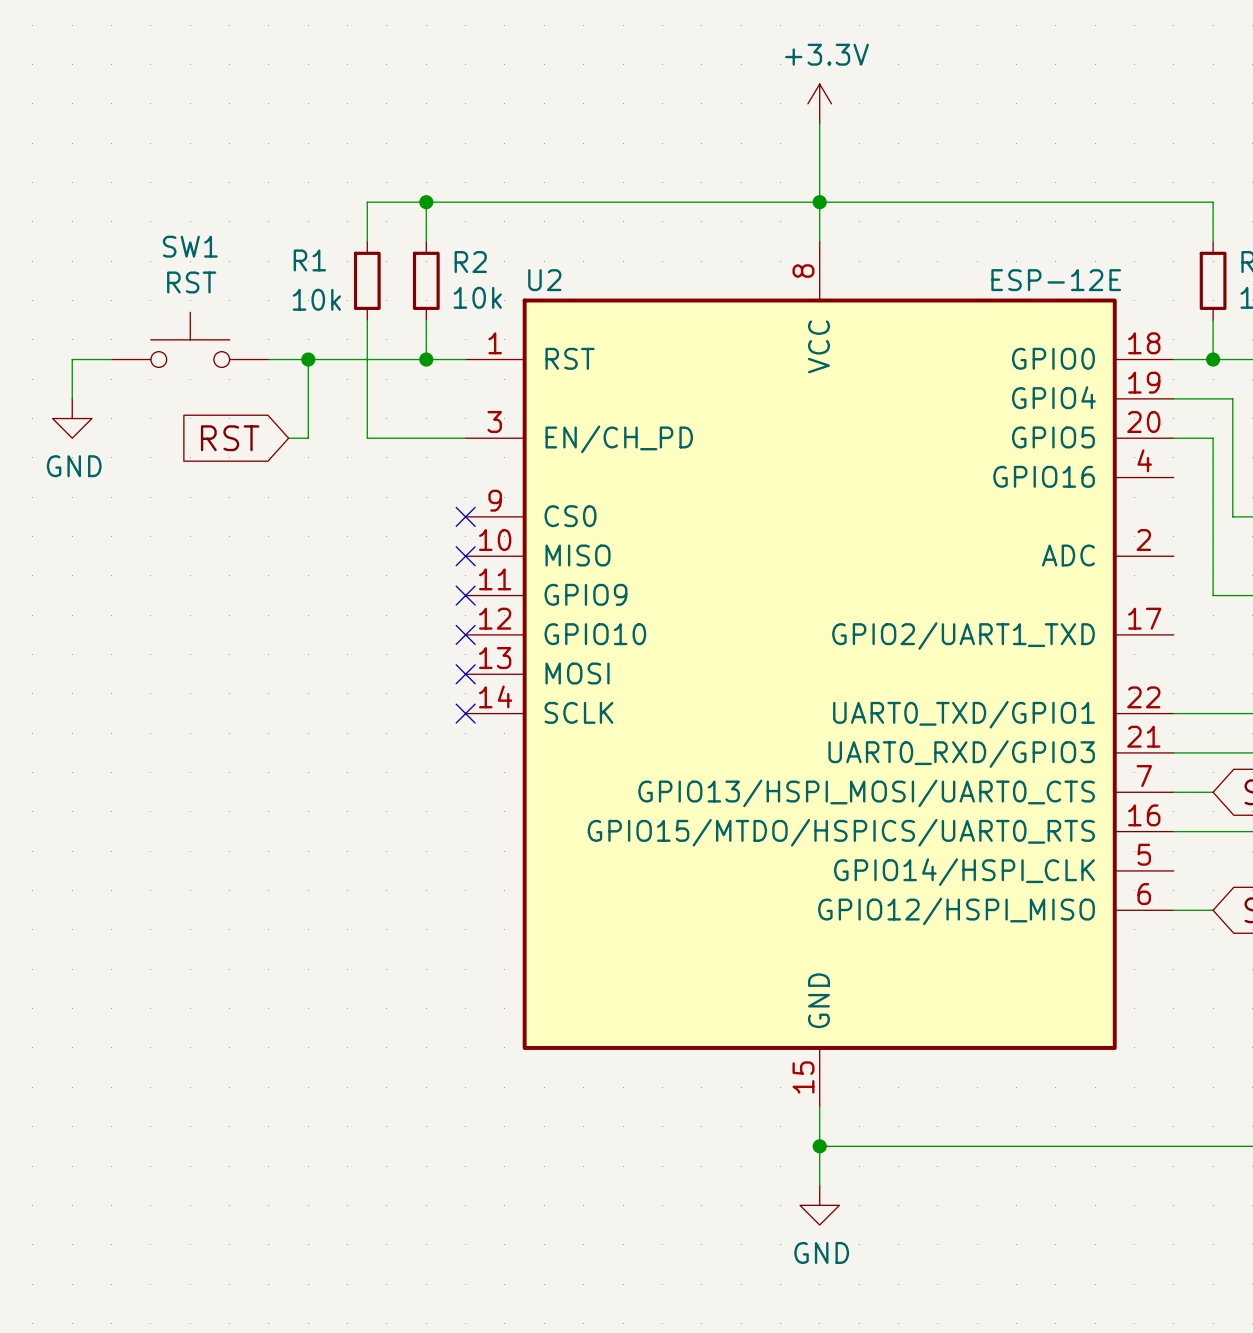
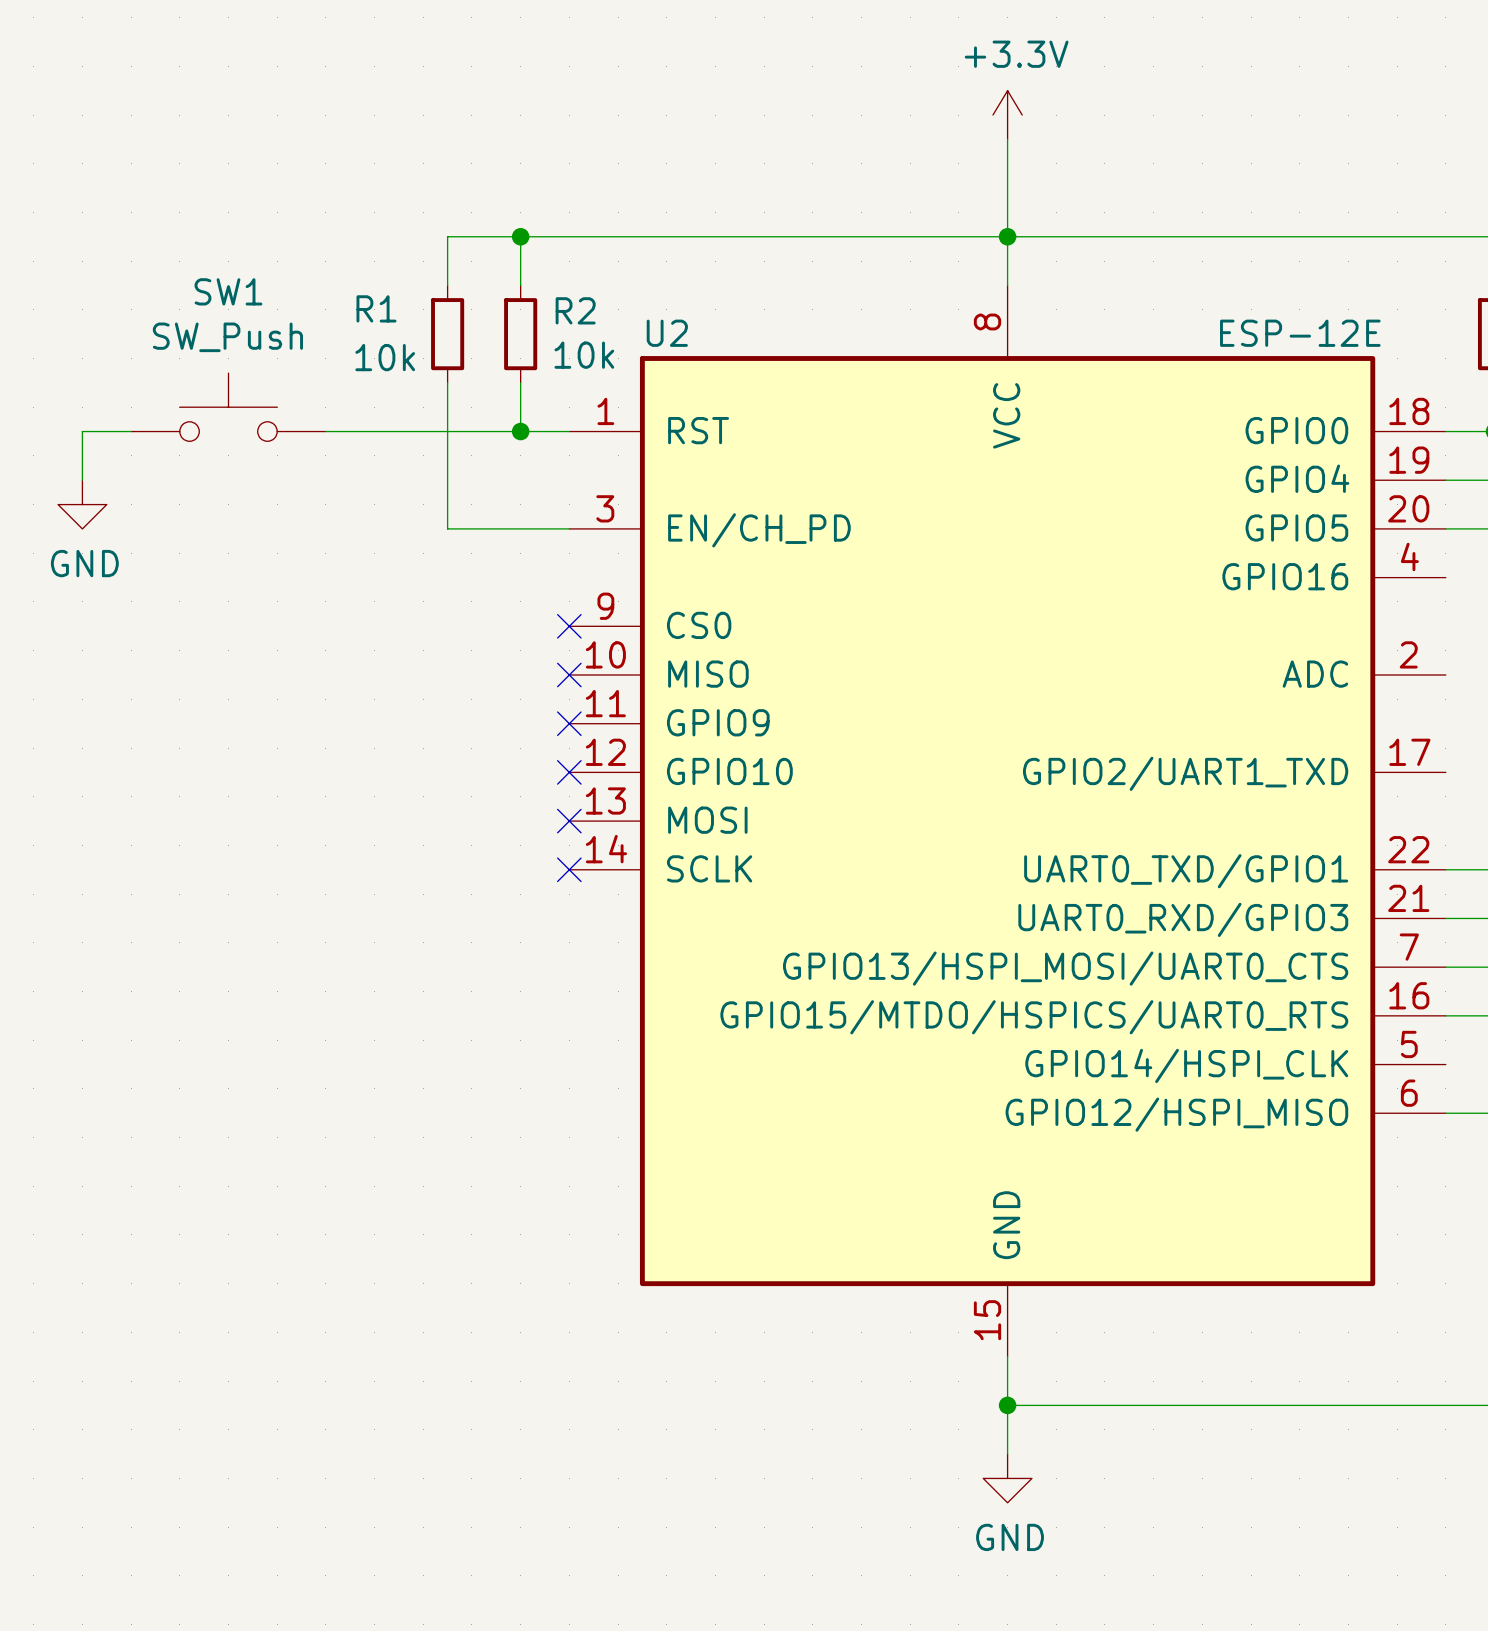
SW1 value: RST (191, 282) -> SW_Push (227, 337)
wire: (308, 359) (308, 438) (288, 438) -> none
junction: (308, 359) -> none
global label: RST (230, 438) -> none

